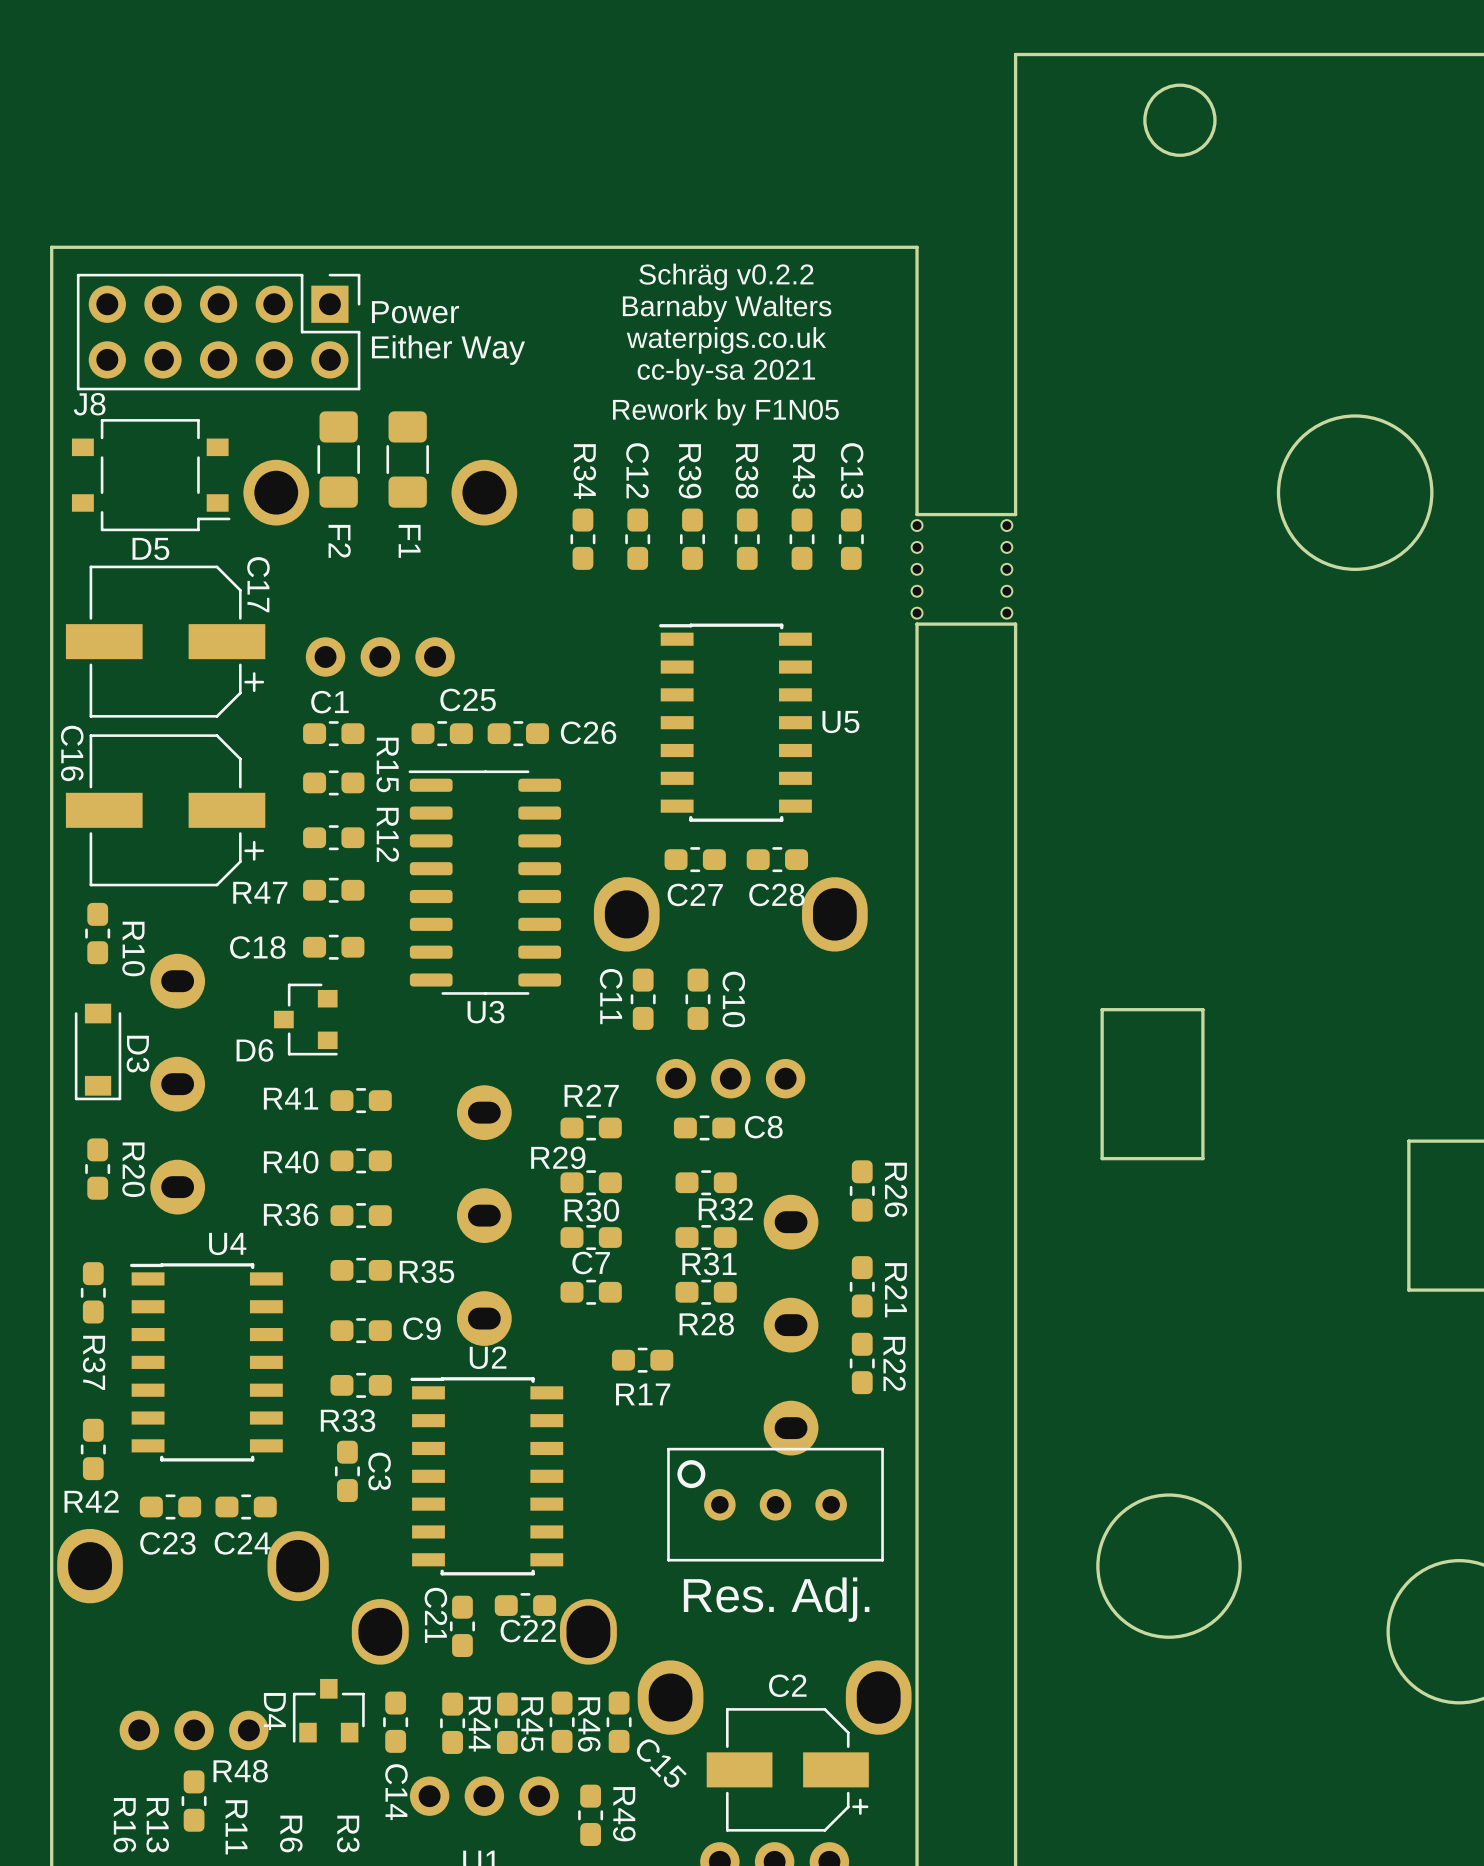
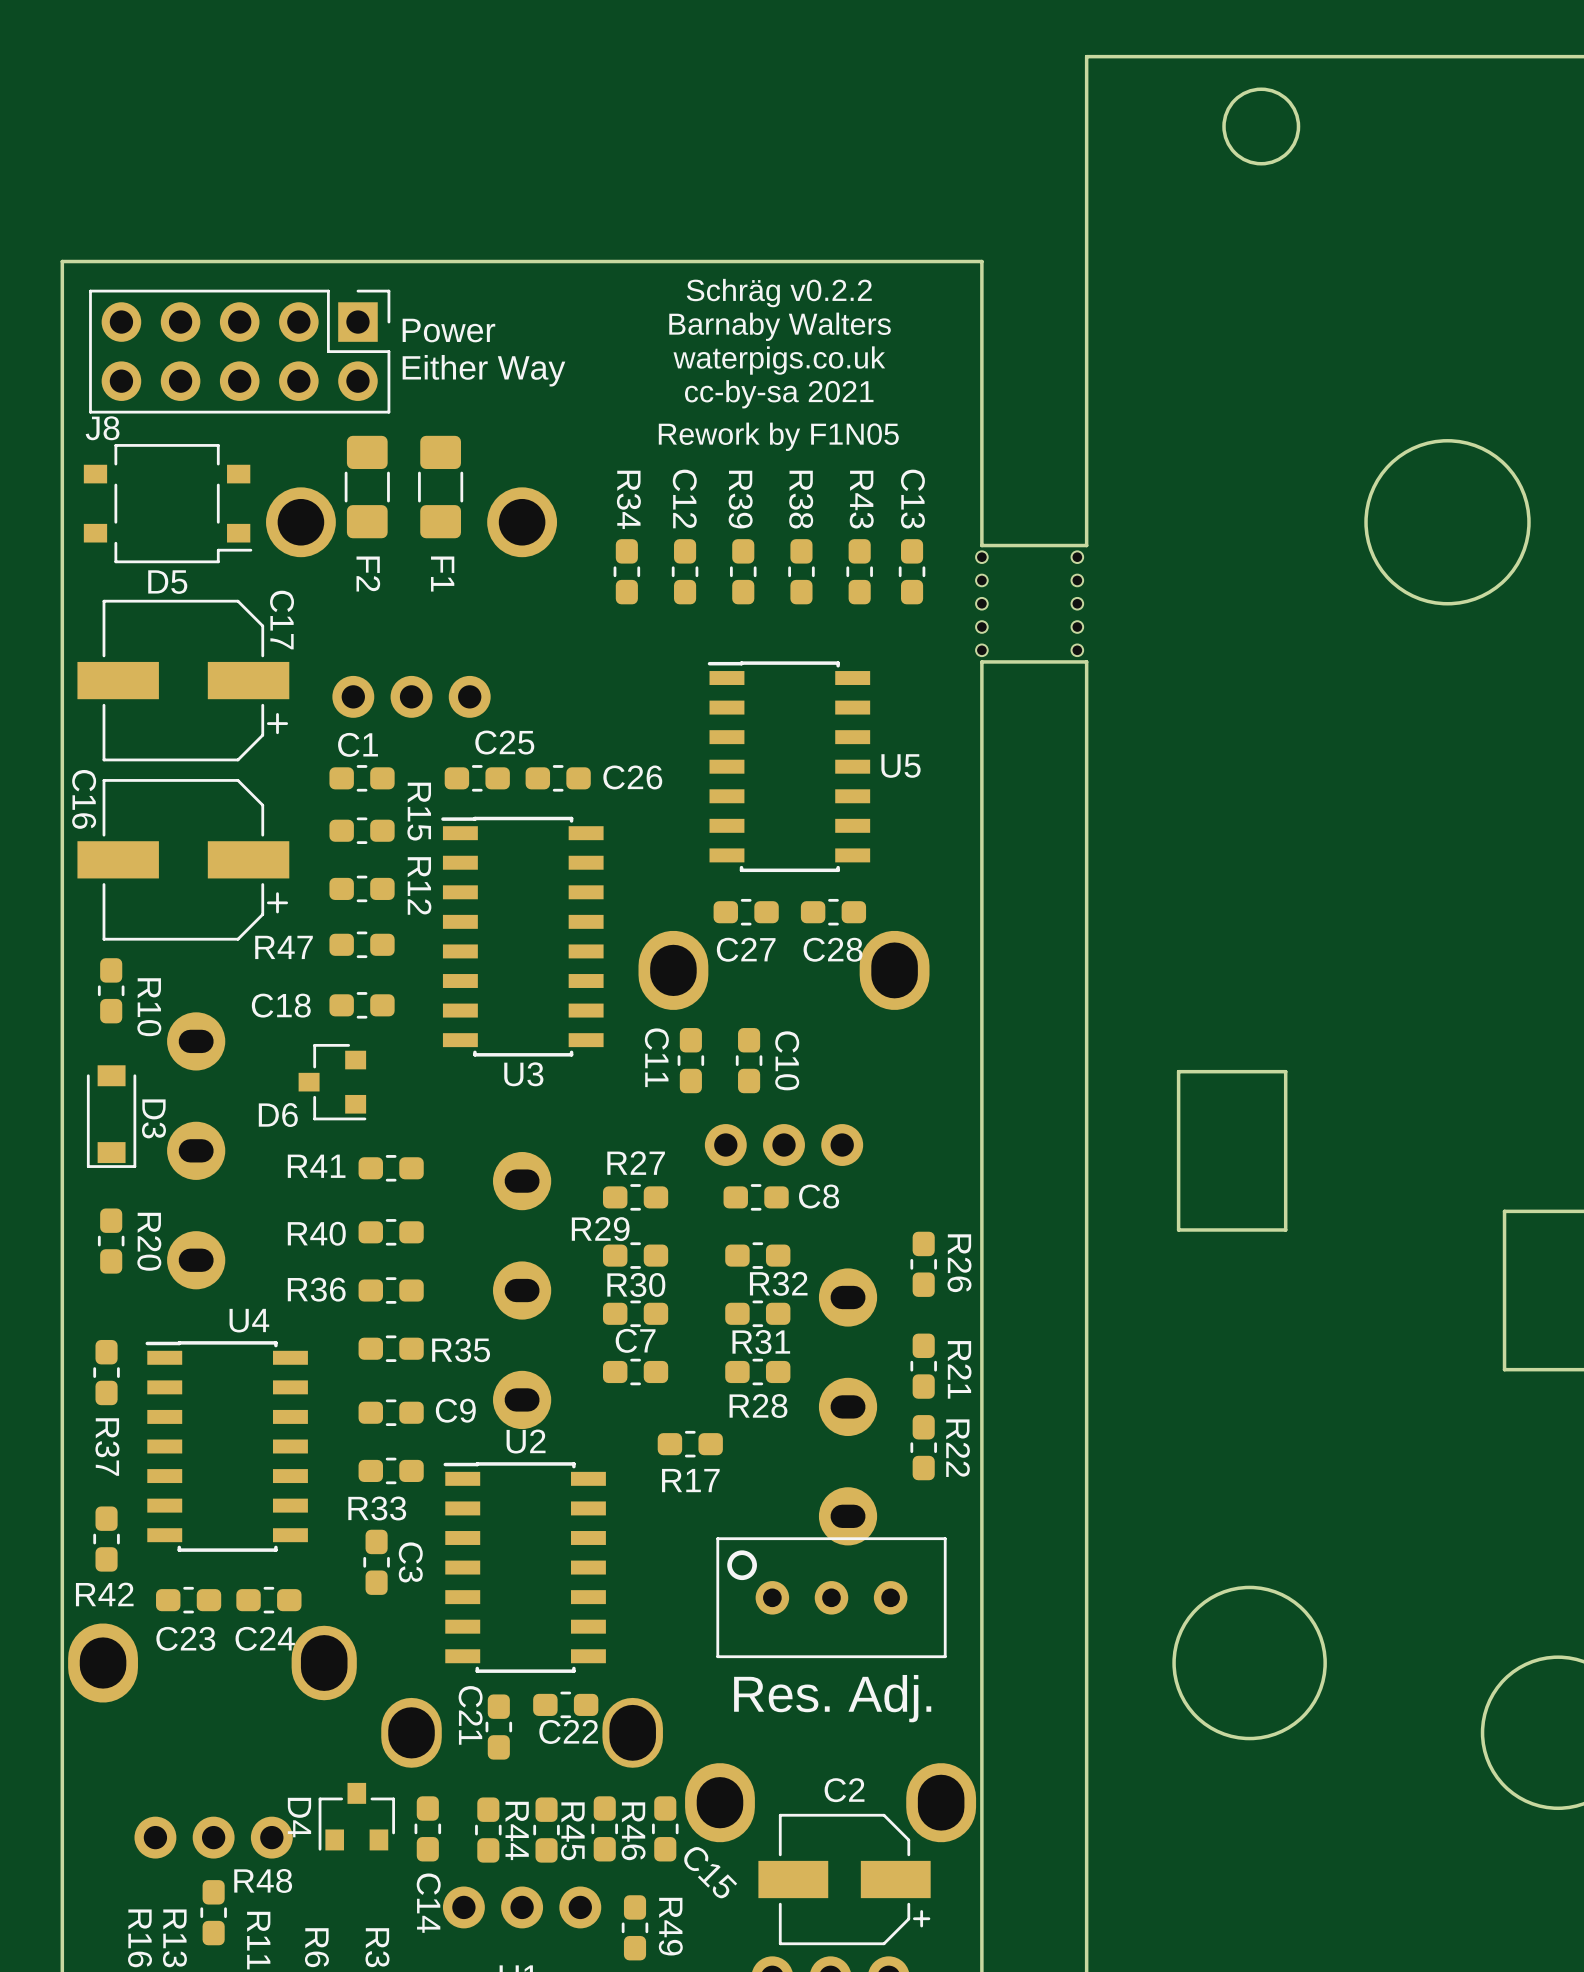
U3 footprint: [408, 770, 562, 995] -> [441, 816, 604, 1057]

